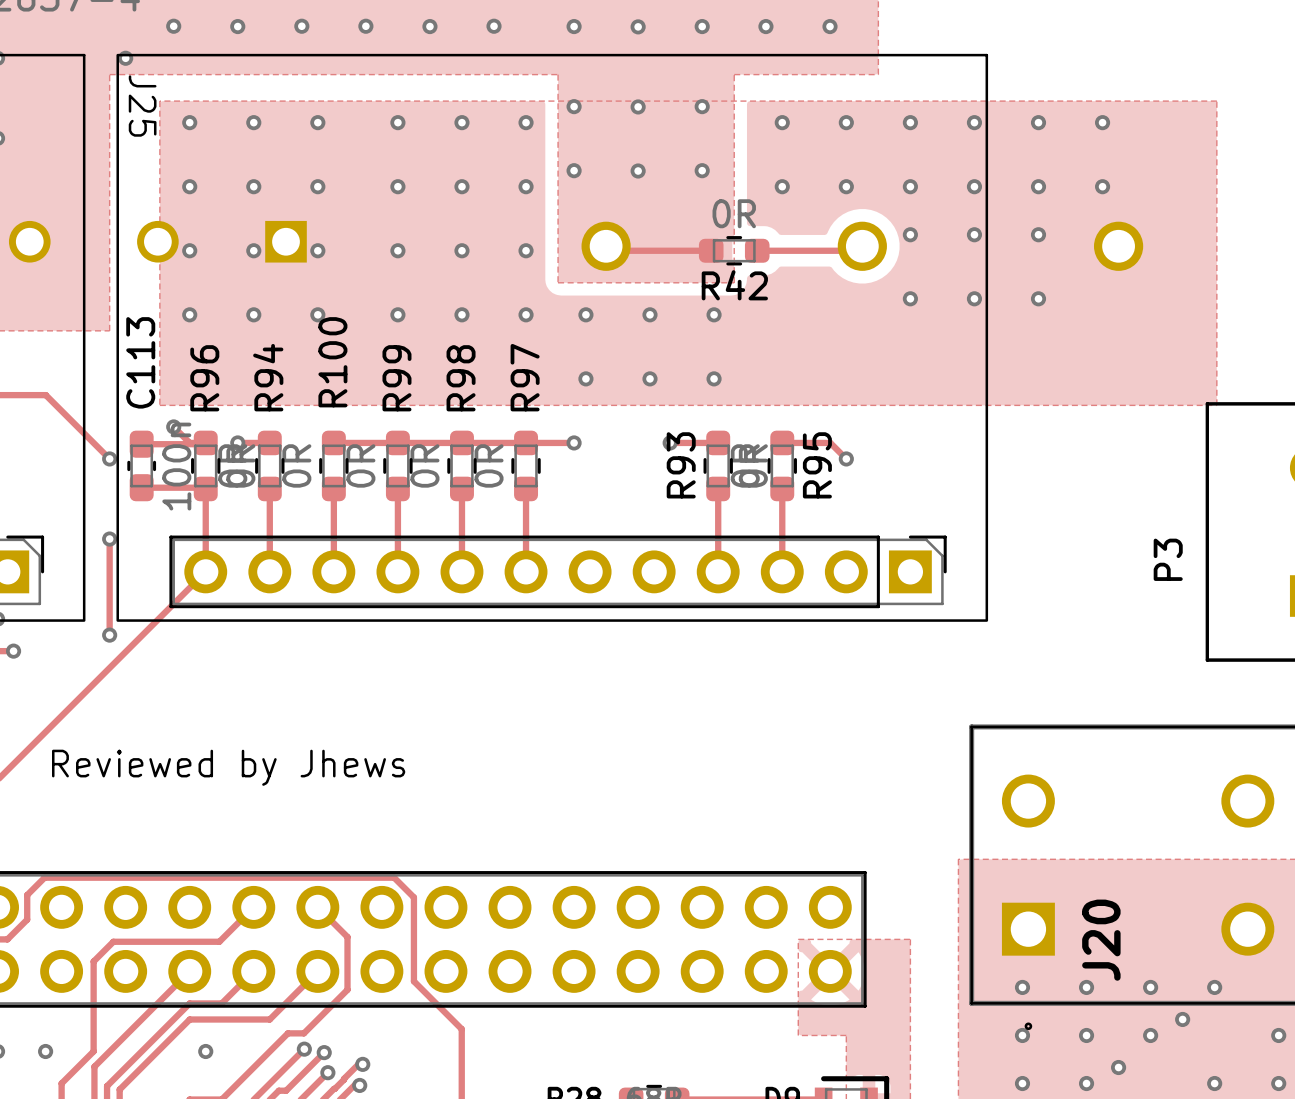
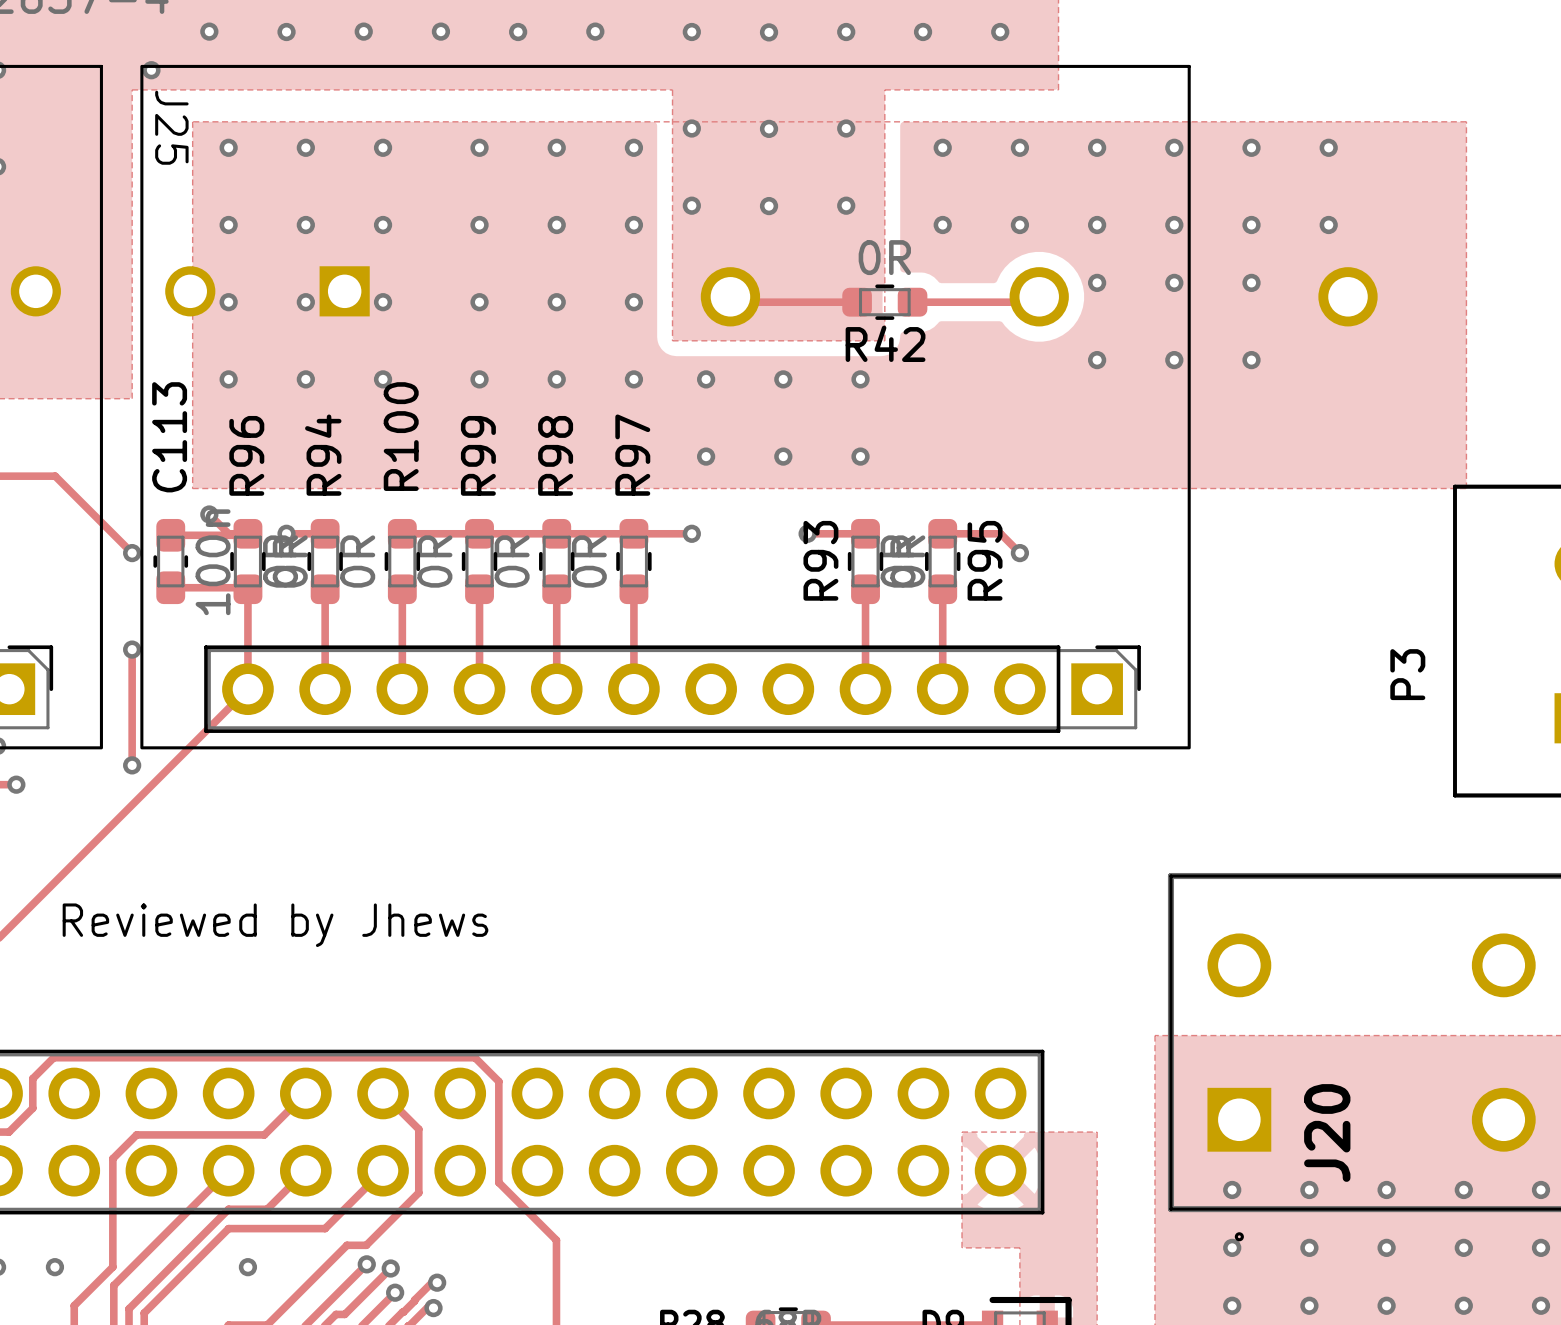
via: none -> (1541, 1189)
via: (1182, 1019) -> none
via: none -> (1463, 1247)
via: (1118, 1067) -> none
via: none -> (1386, 1305)

